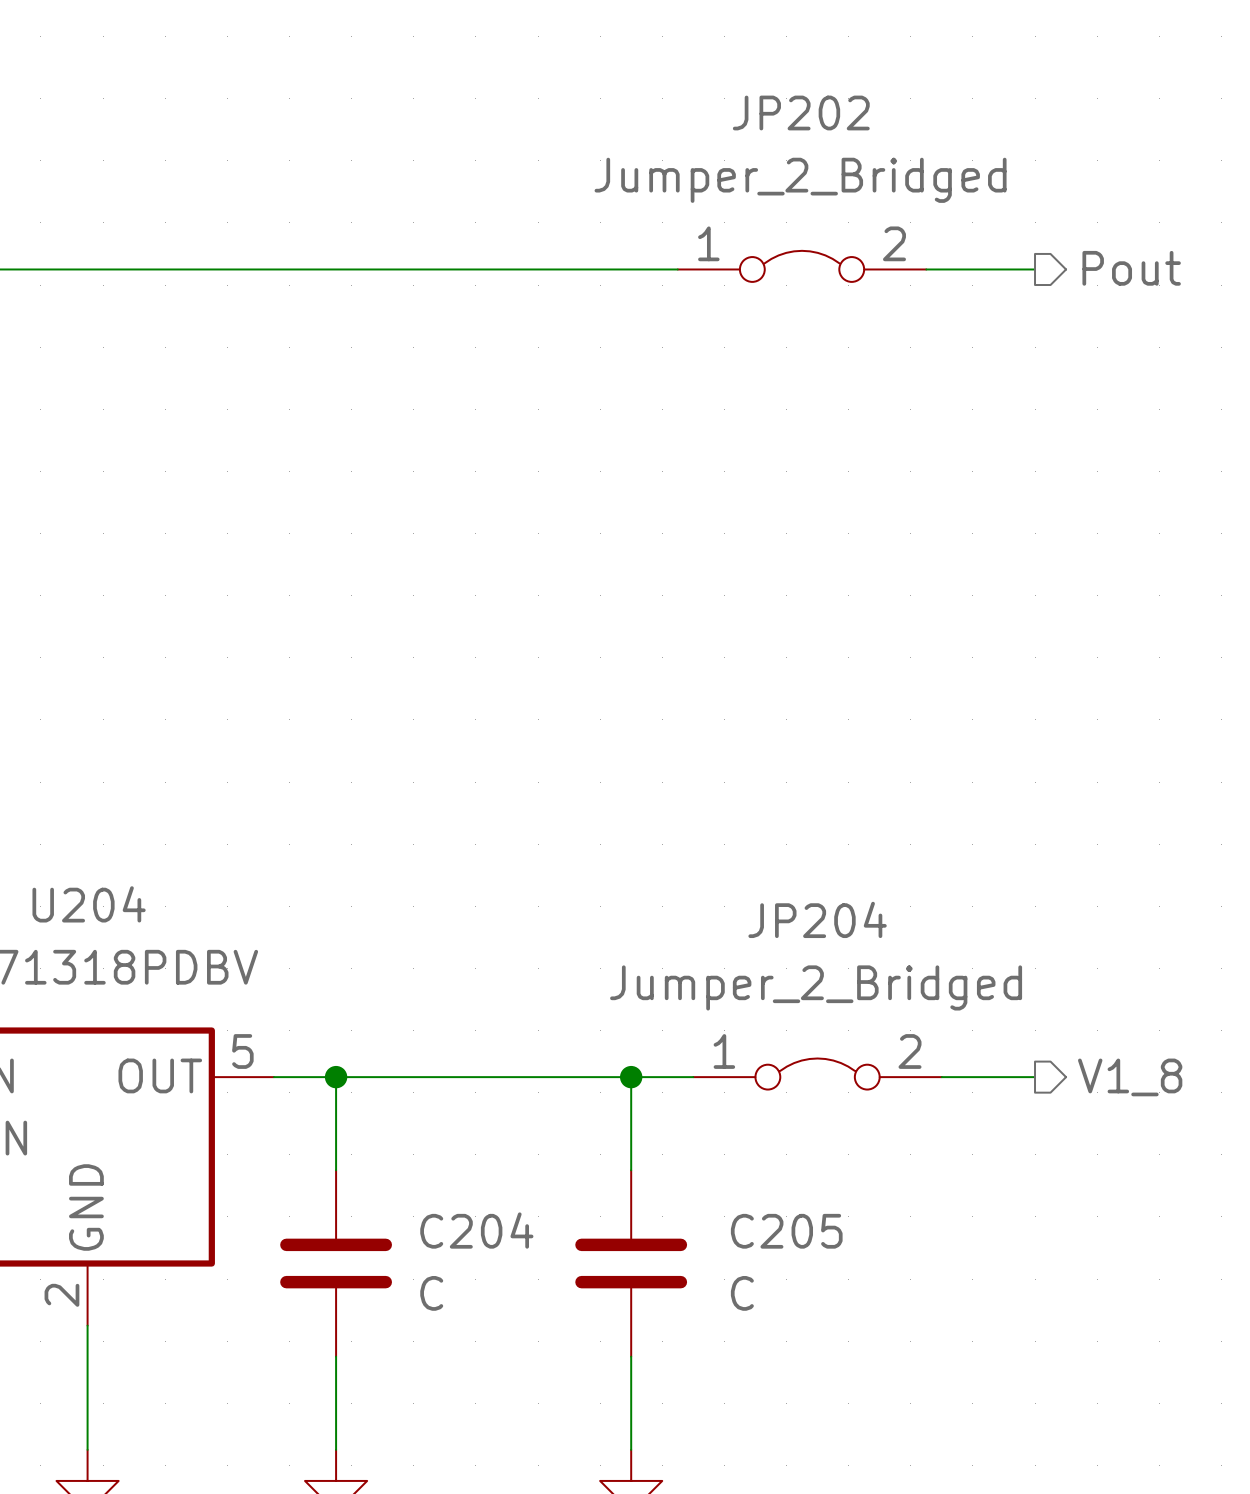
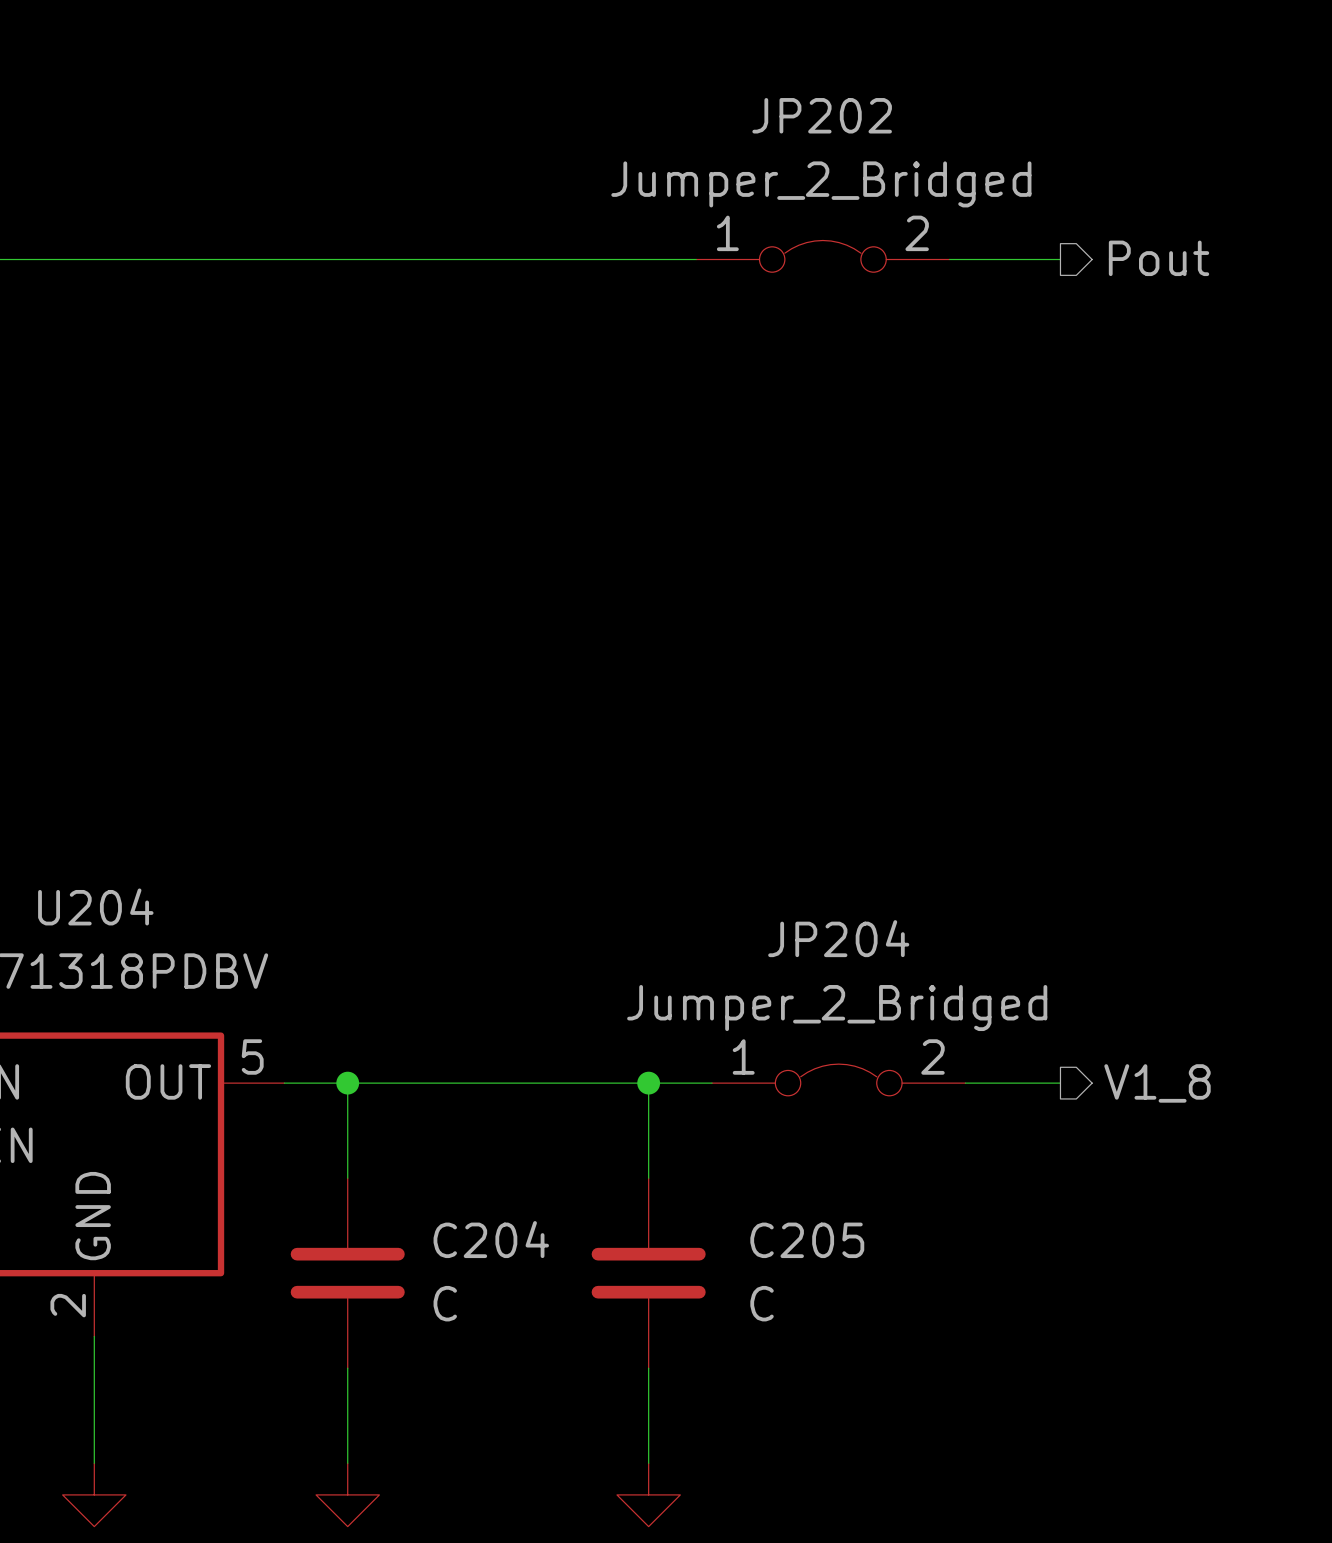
JP202 name position: JP202 (801, 113) -> JP202 (822, 115)
JP202 value position: Jumper_2_Bridged (800, 180) -> Jumper_2_Bridged (821, 184)
JP204 name position: JP204 (817, 919) -> JP204 (838, 938)
JP204 value position: Jumper_2_Bridged (816, 987) -> Jumper_2_Bridged (837, 1008)

